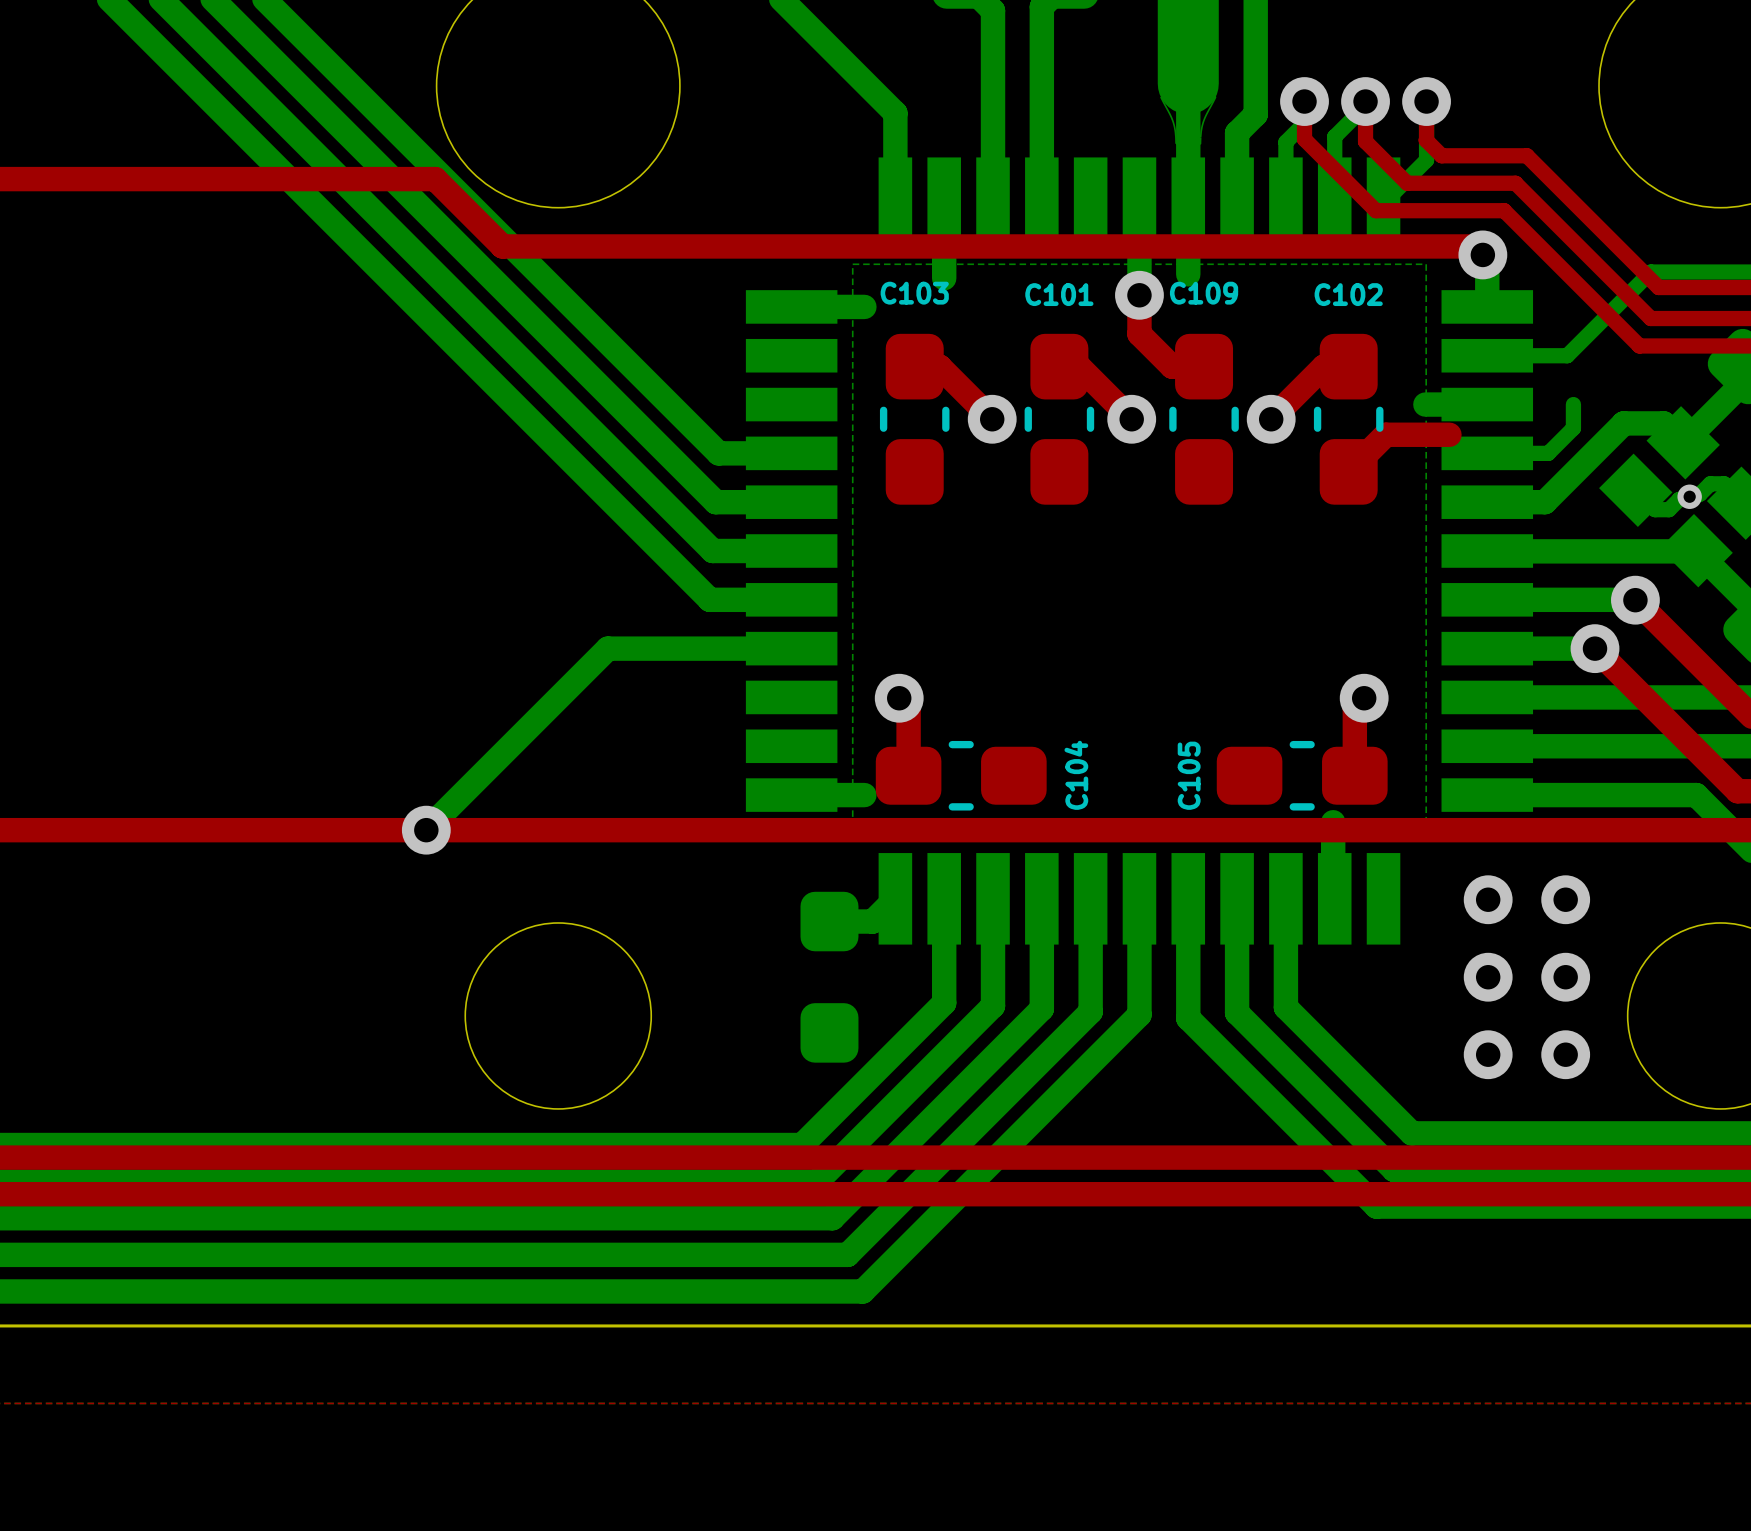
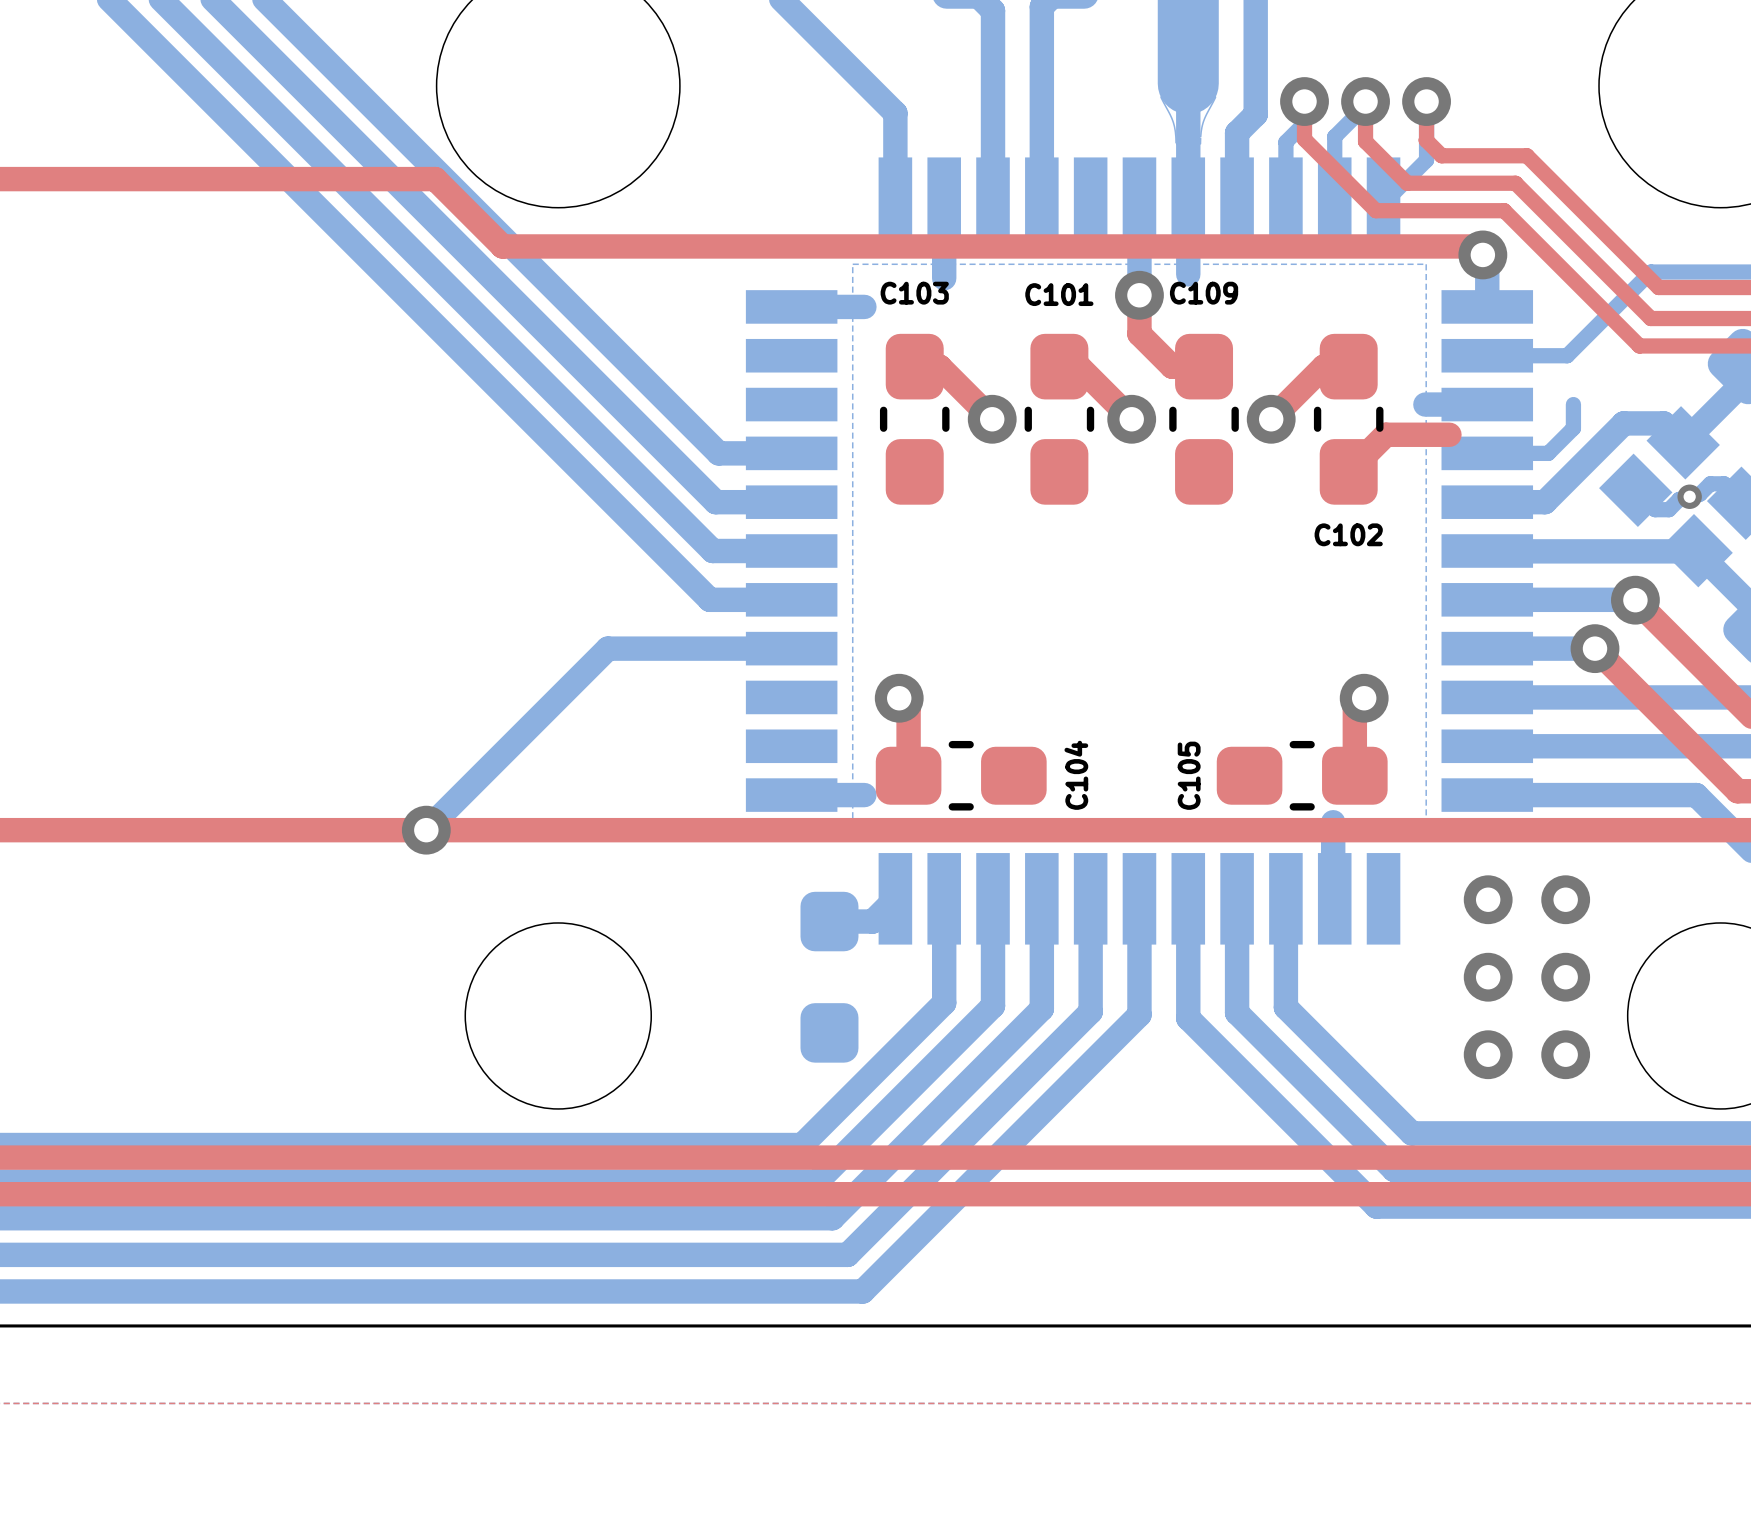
C102 name position: C102 (1348, 294) -> C102 (1348, 534)

